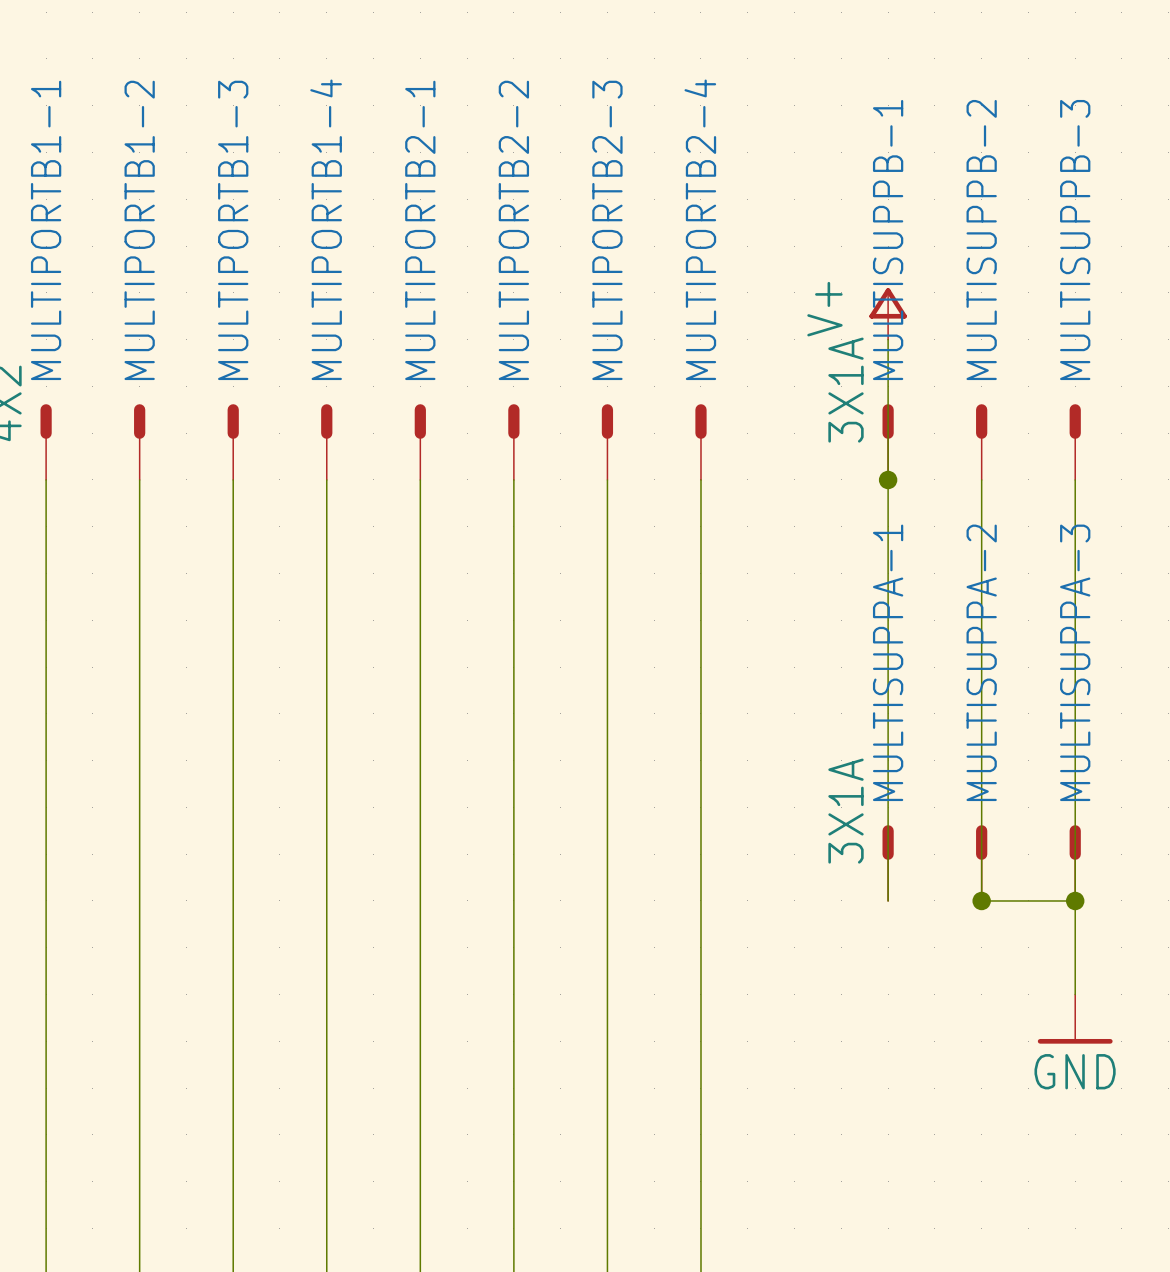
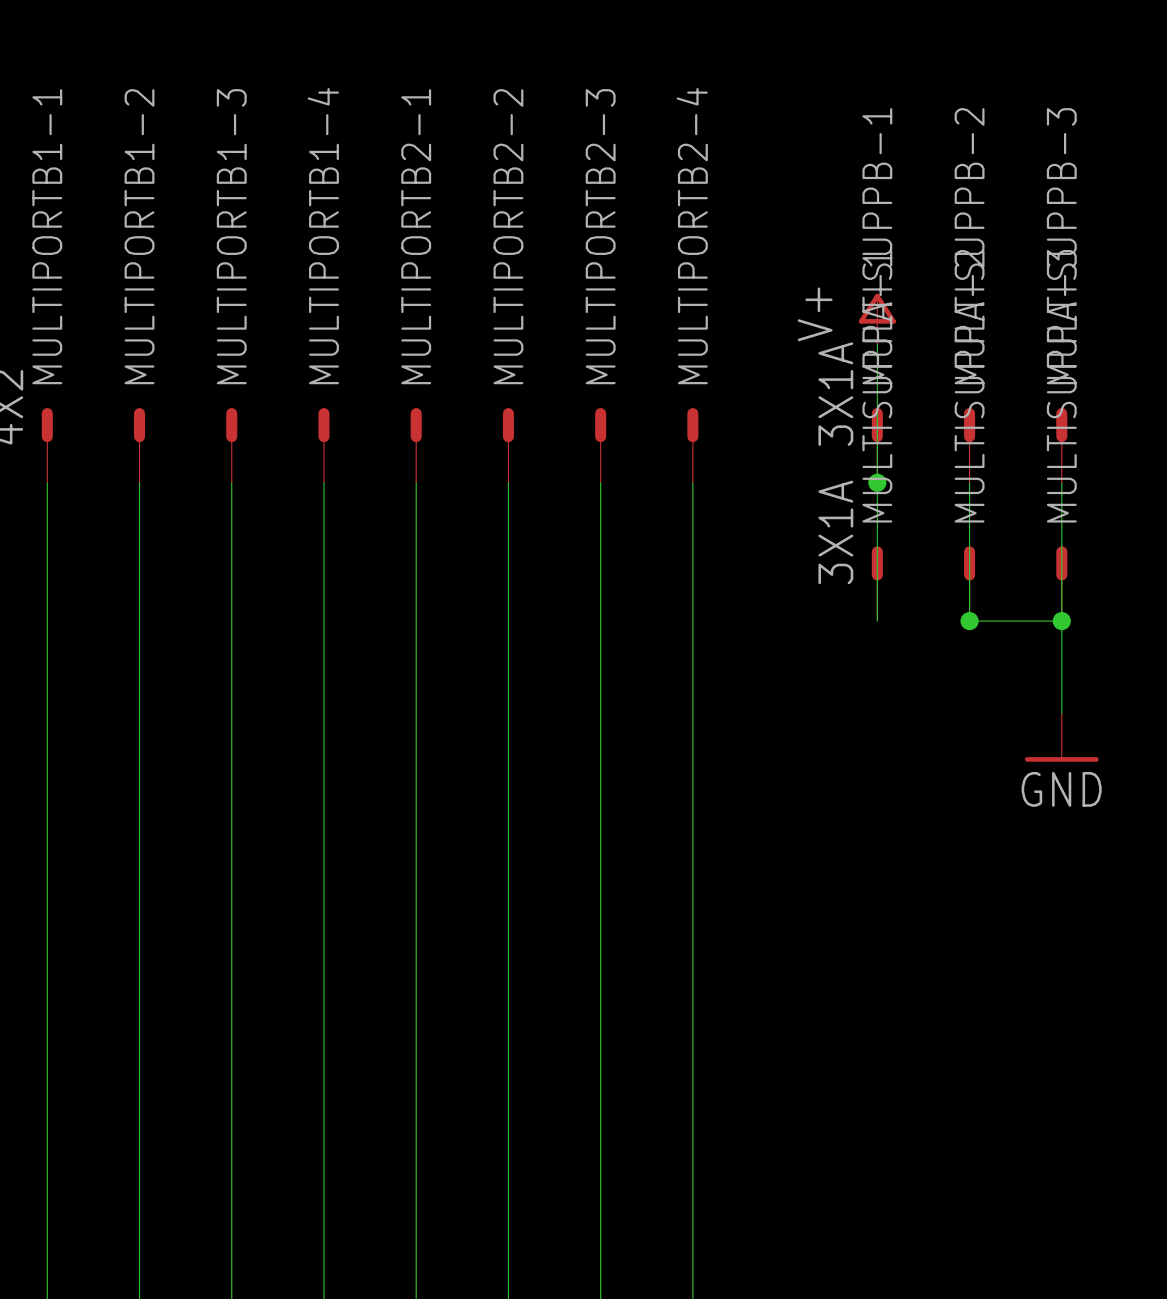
wire: (888, 620) (888, 900) -> none
wire: (981, 620) (981, 900) (1075, 900) -> (969, 621) (1061, 621)
junction: none -> (969, 621)
junction: none -> (1061, 621)
wire: (1075, 713) (1075, 994) -> none
MULTISUPPA-1 position: (888, 863) -> (877, 583)
MULTISUPPA-2 position: (981, 863) -> (969, 583)
MULTISUPPA-3 position: (1075, 863) -> (1061, 583)
junction: (981, 900) -> none
junction: (1075, 900) -> none
power symbol position: GND (1075, 1019) -> GND (1061, 737)

